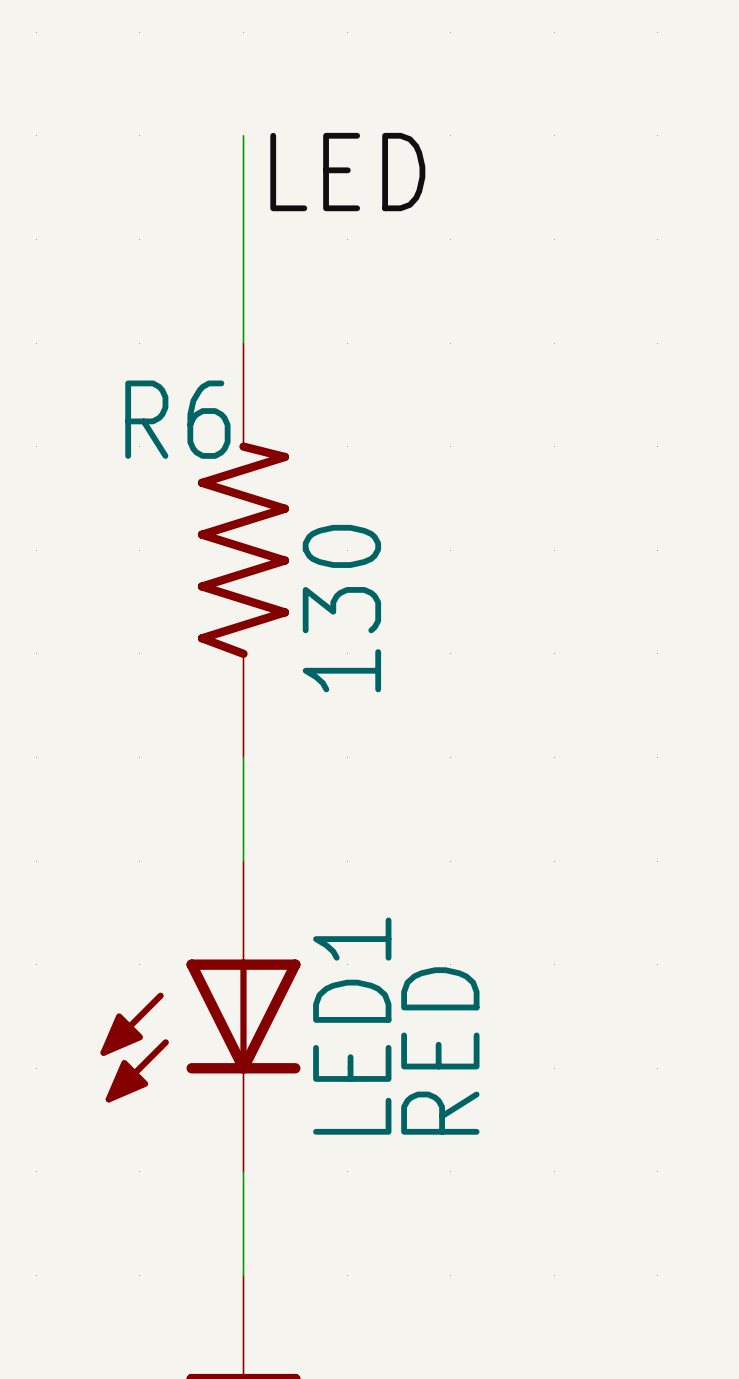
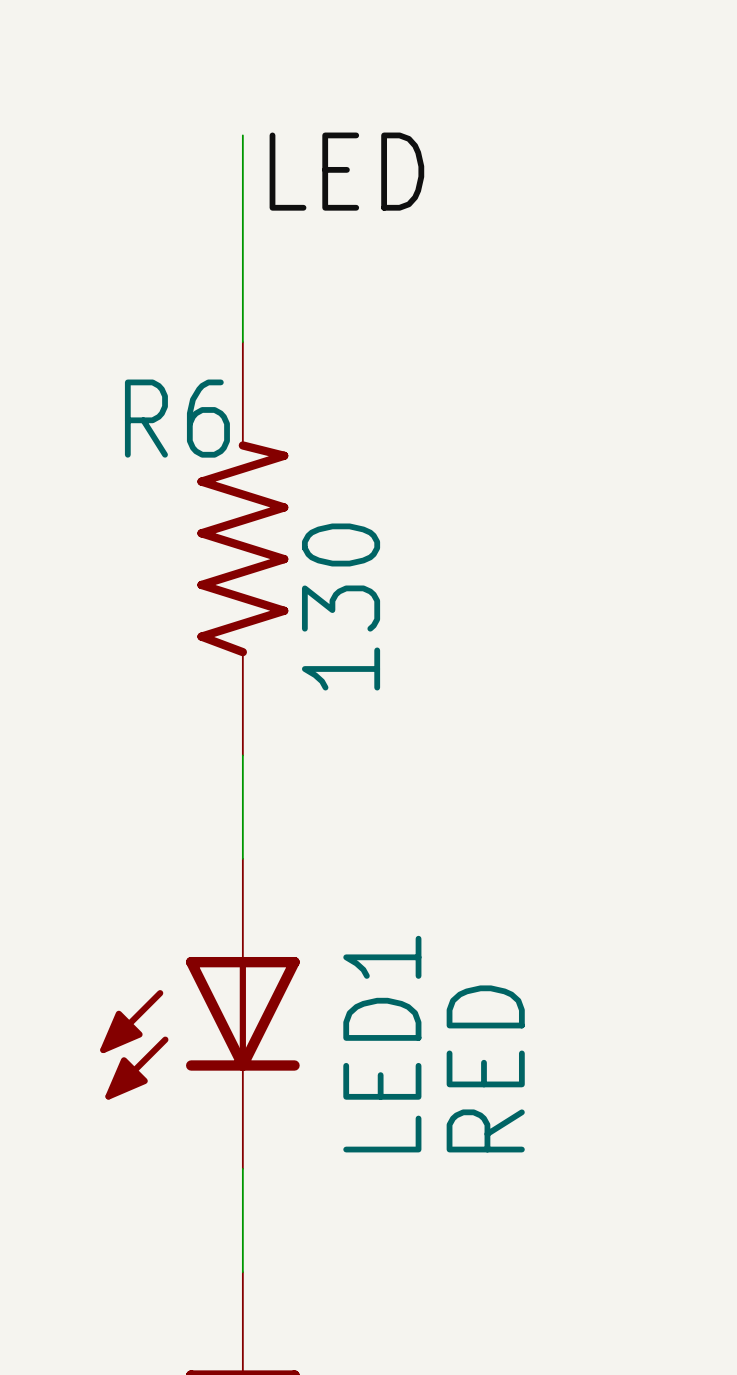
LED1 name position: LED1 (352, 1026) -> LED1 (382, 1044)
LED1 value position: RED (440, 1050) -> RED (485, 1068)

